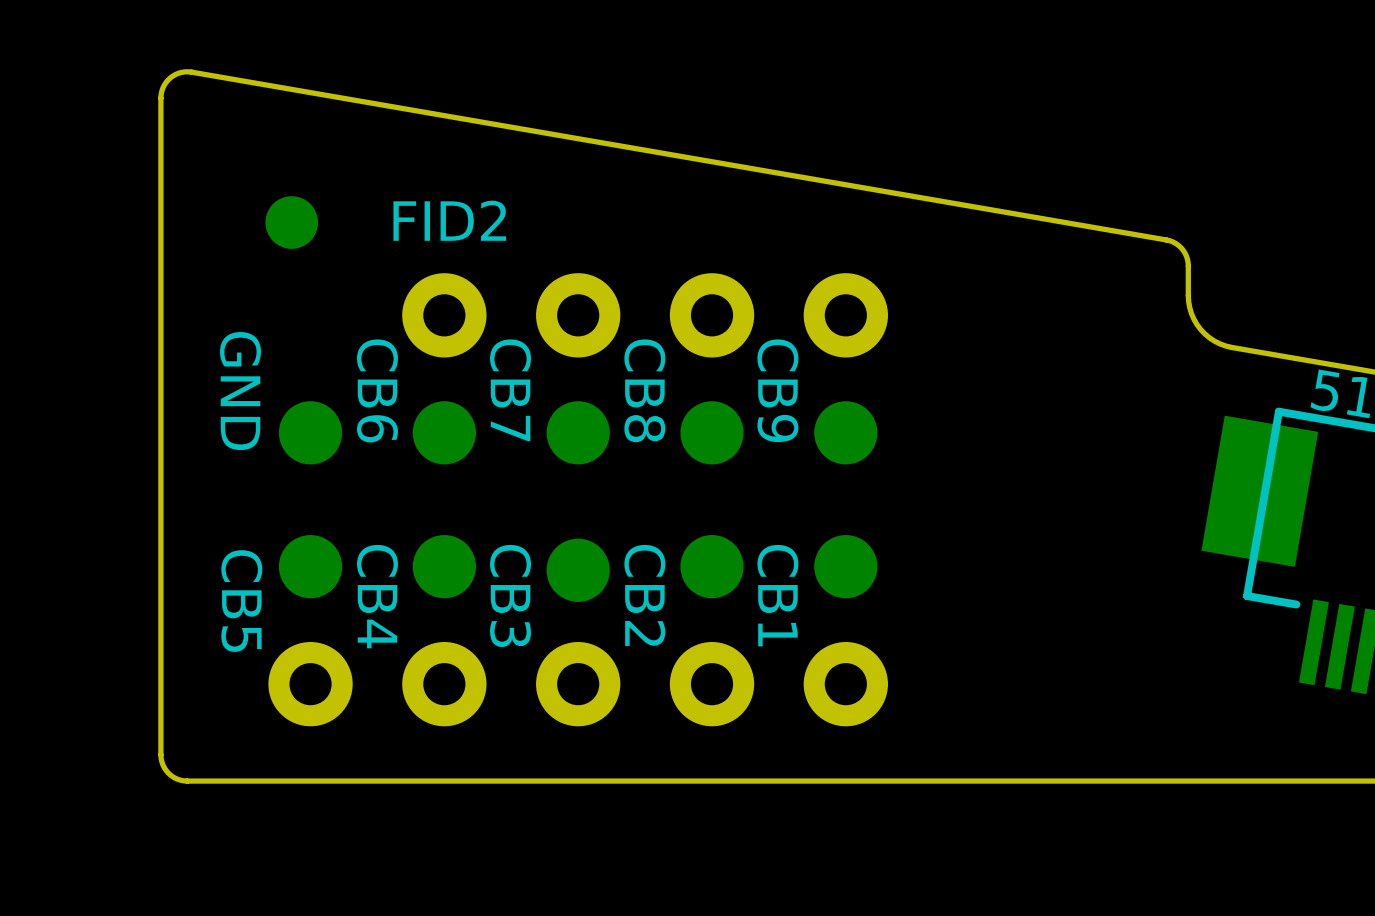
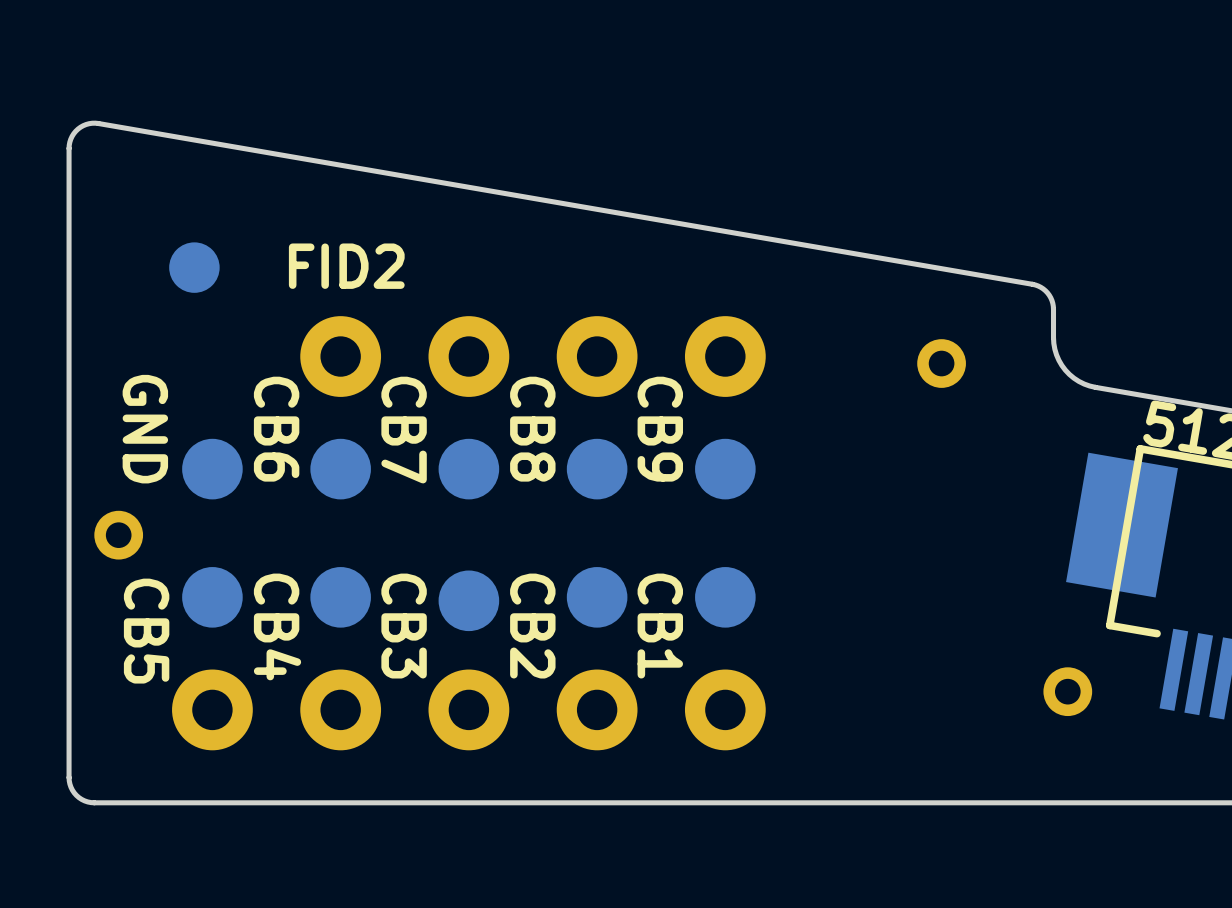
part: none -> (941, 363)
part: none -> (118, 535)
part: none -> (1067, 691)

